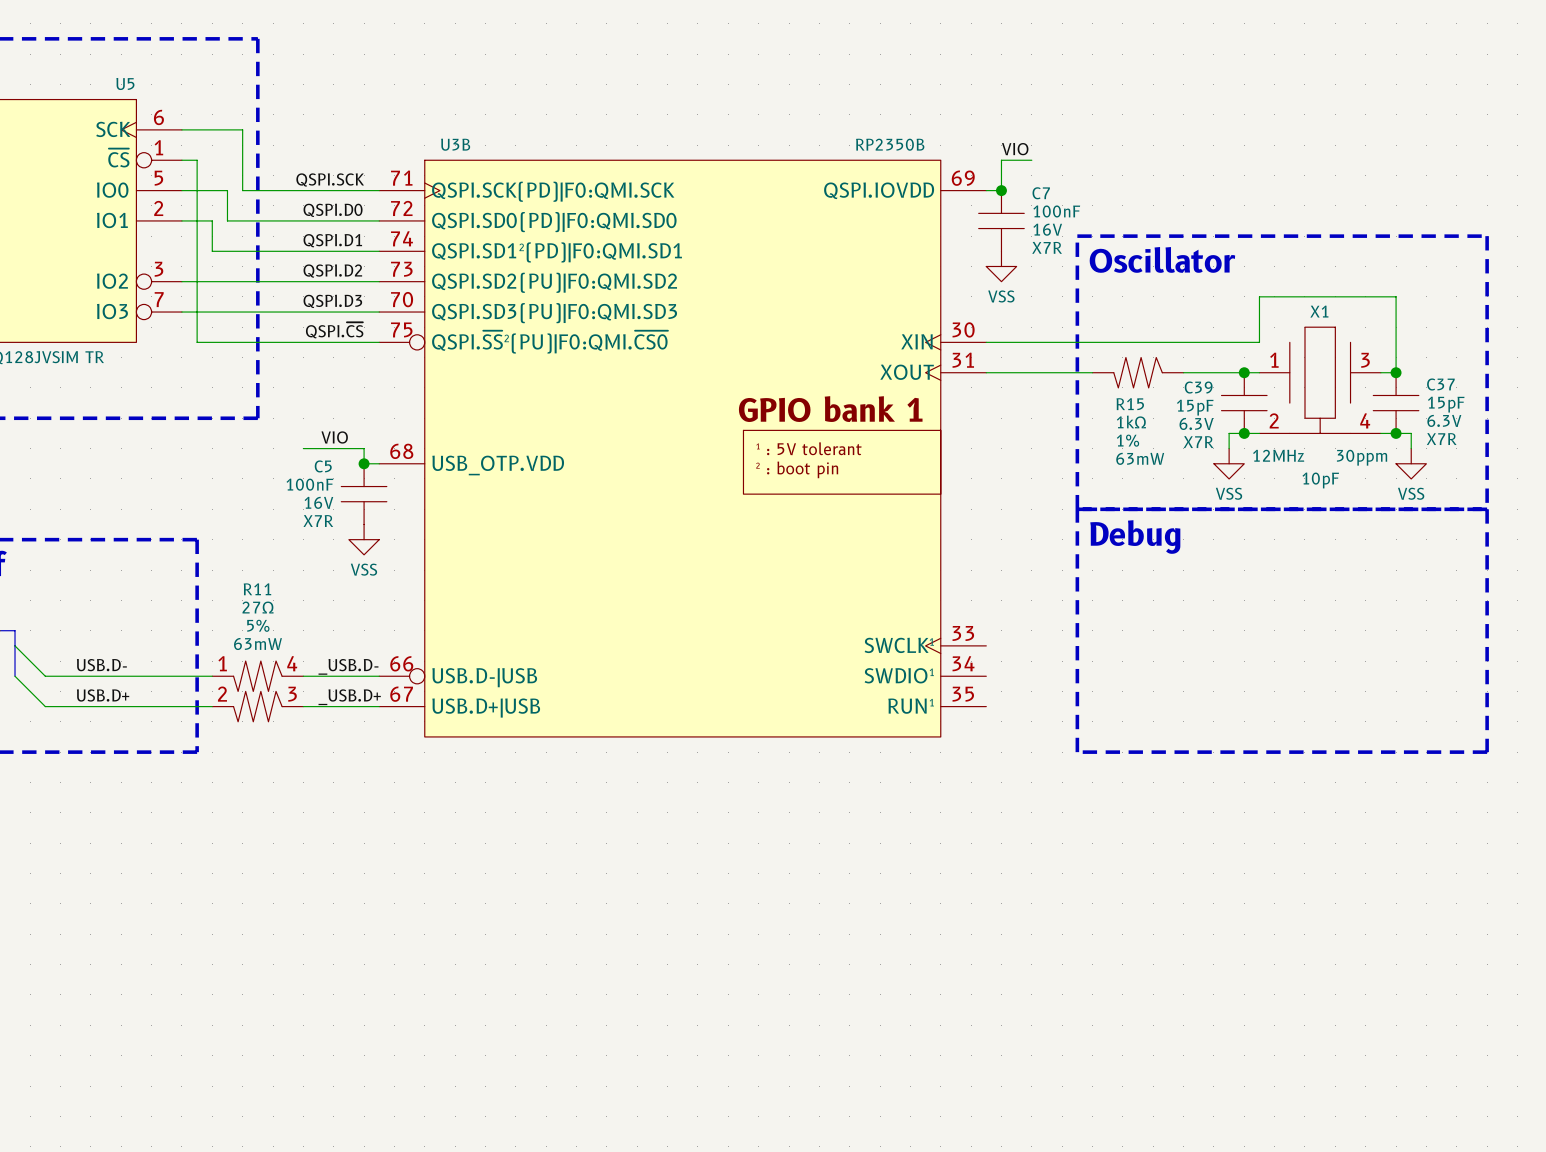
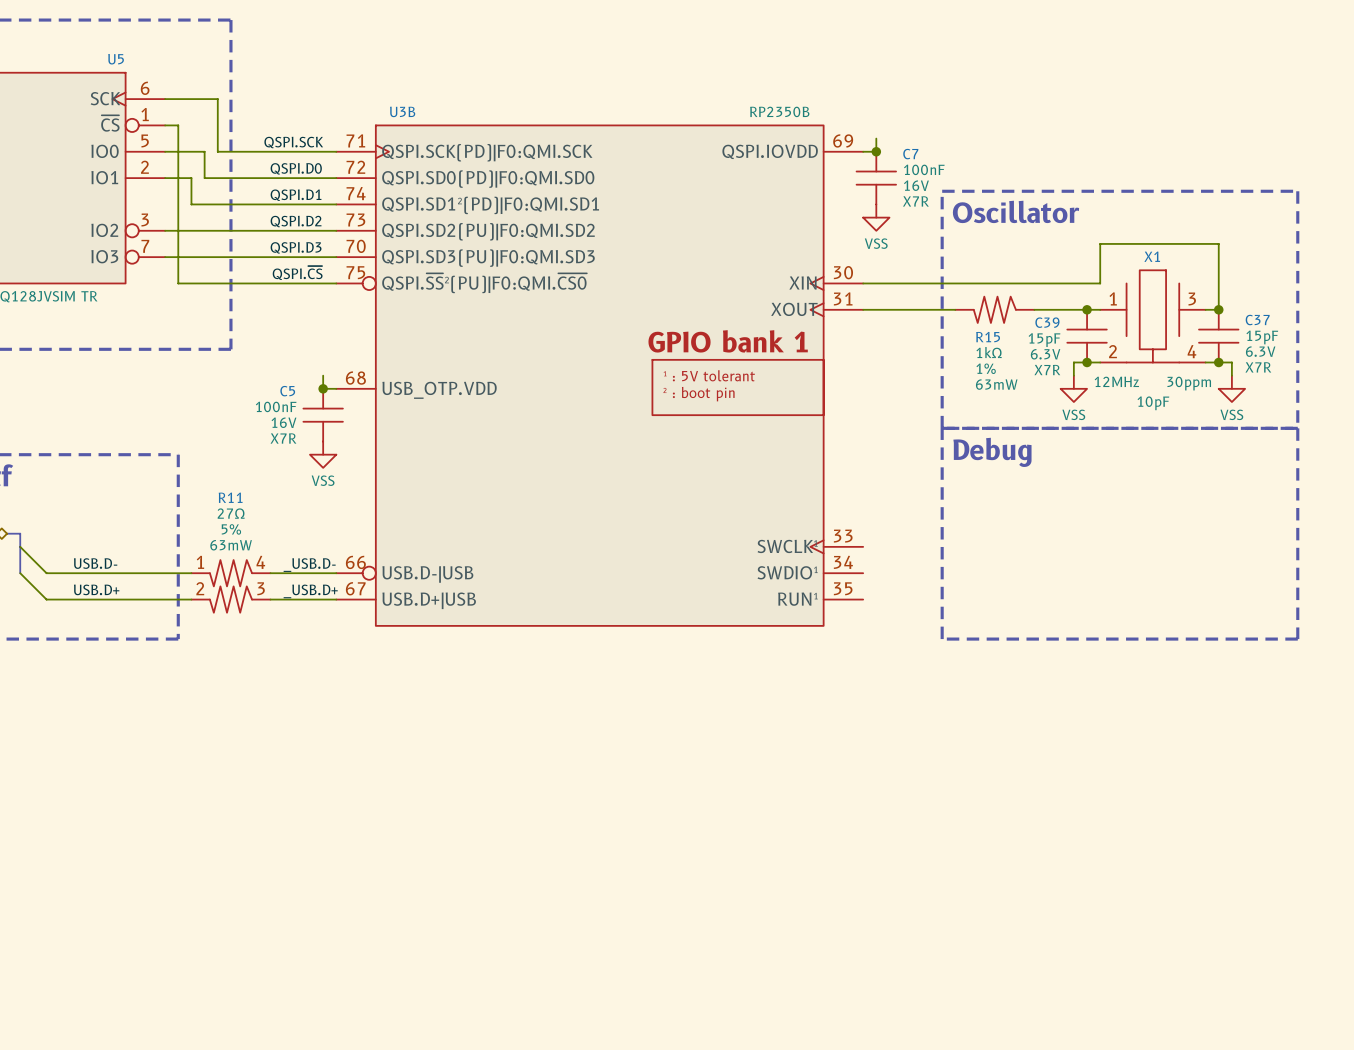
label: VIO (1015, 149) -> none
wire: (1031, 160) (1001, 160) (1001, 175) -> none
label: VIO (334, 437) -> none
wire: (303, 448) (364, 448) -> none

